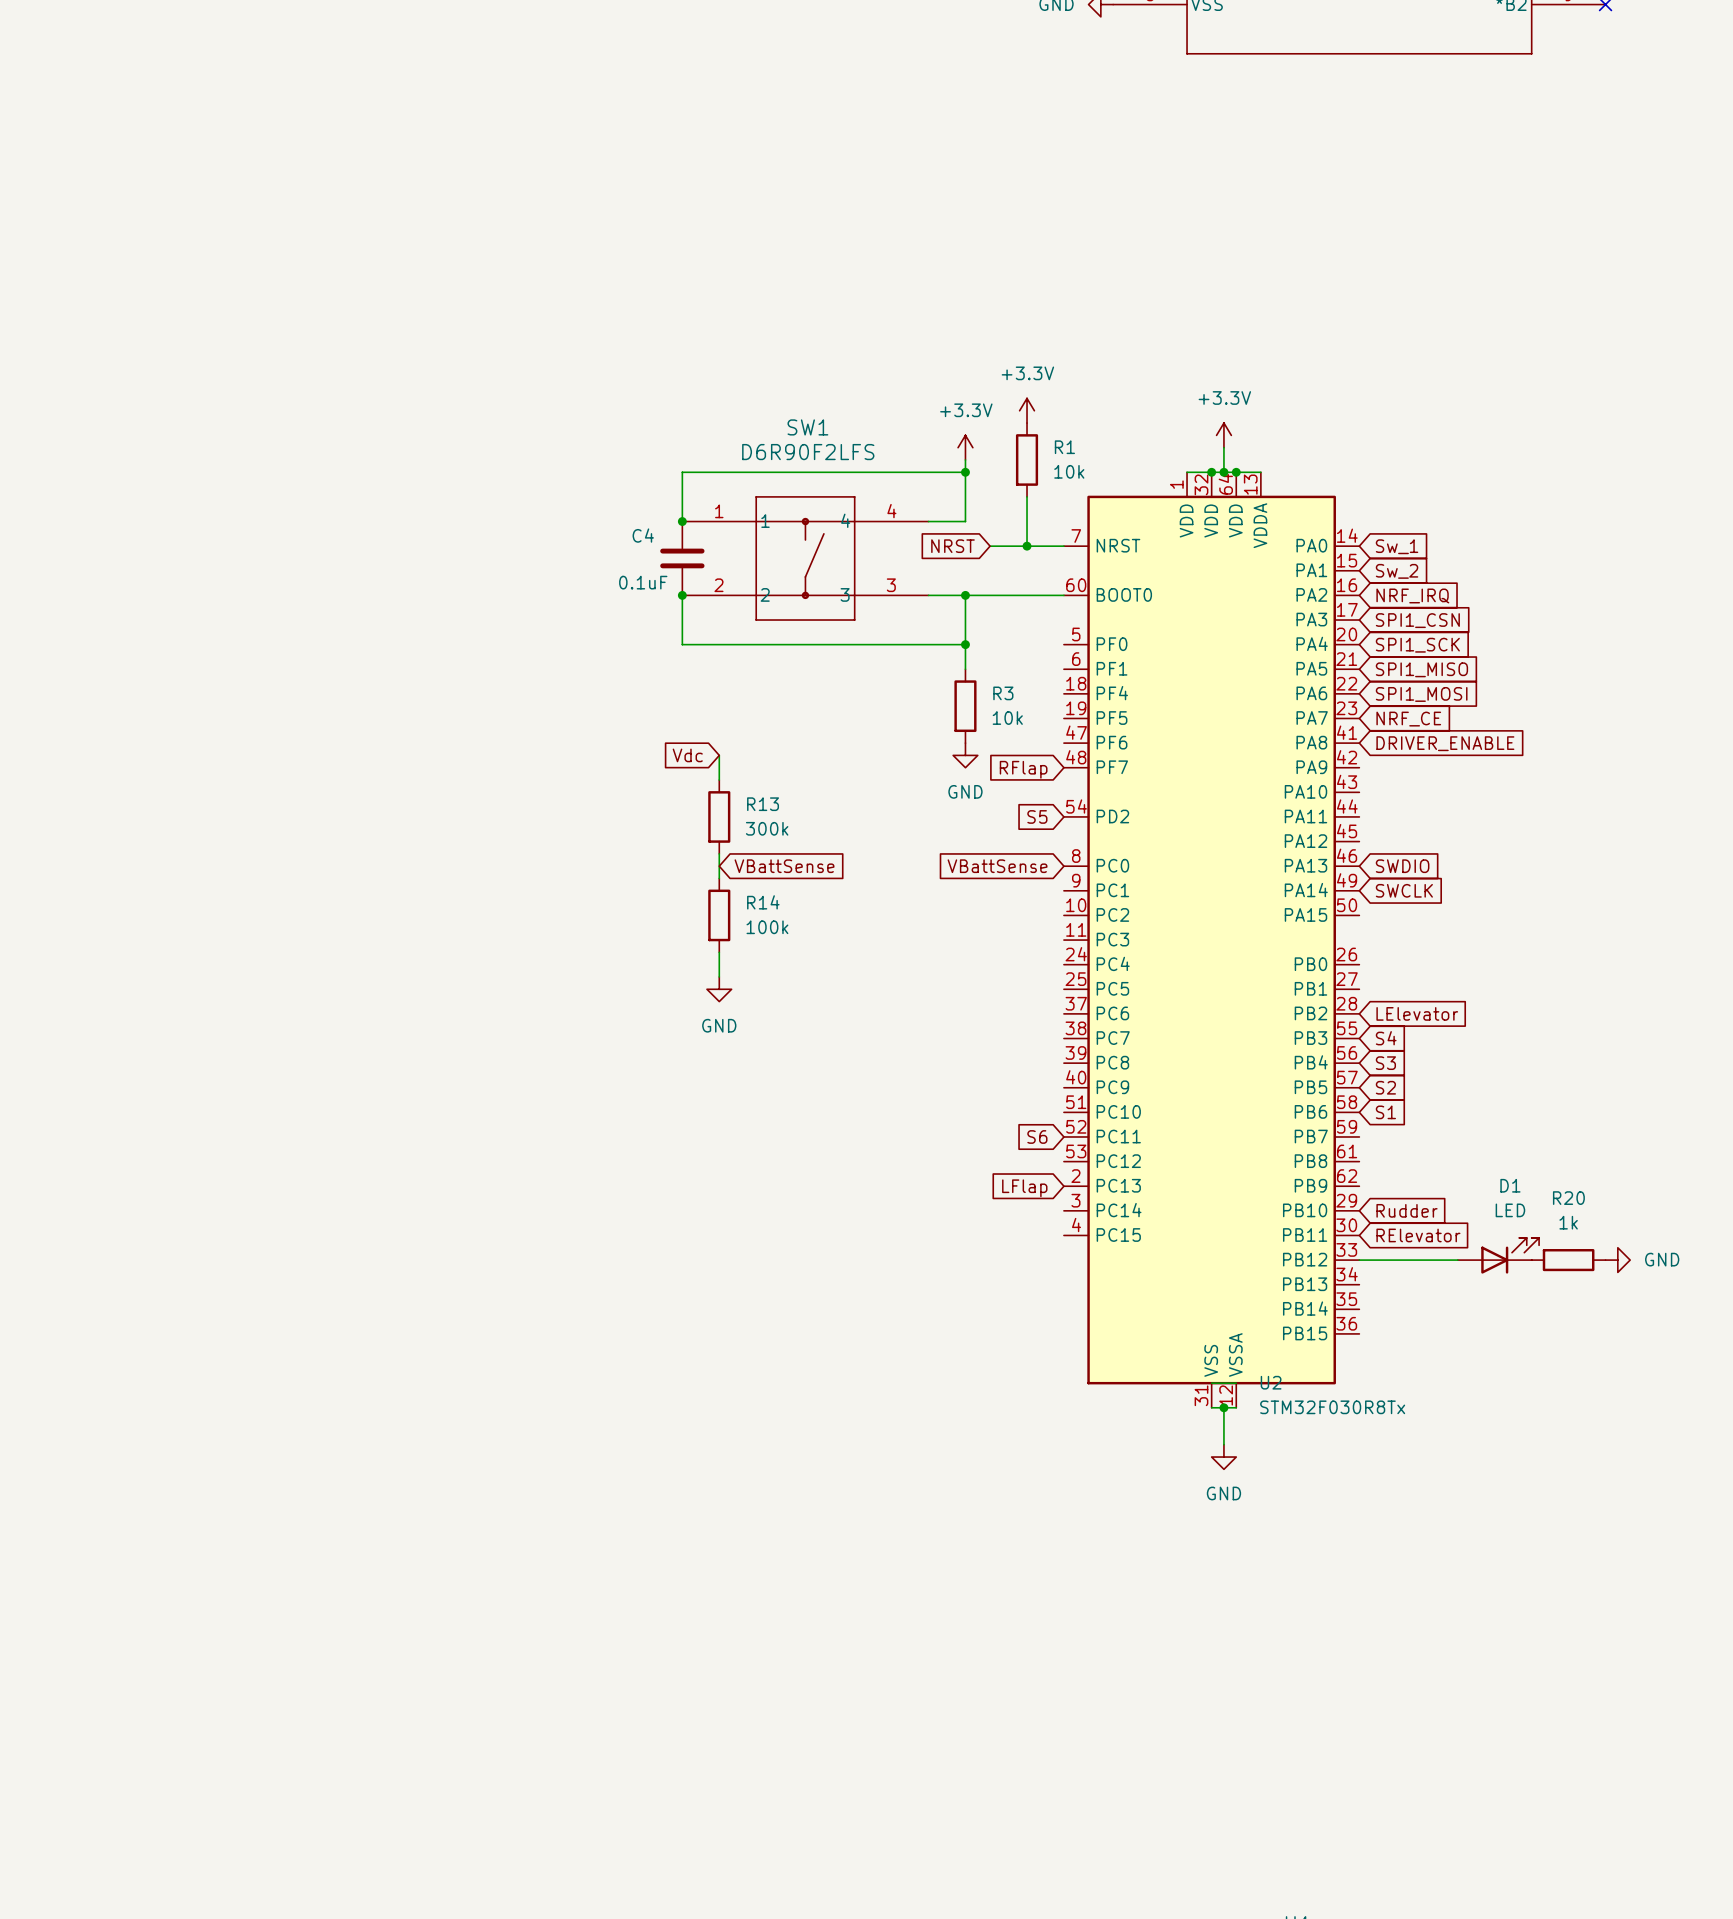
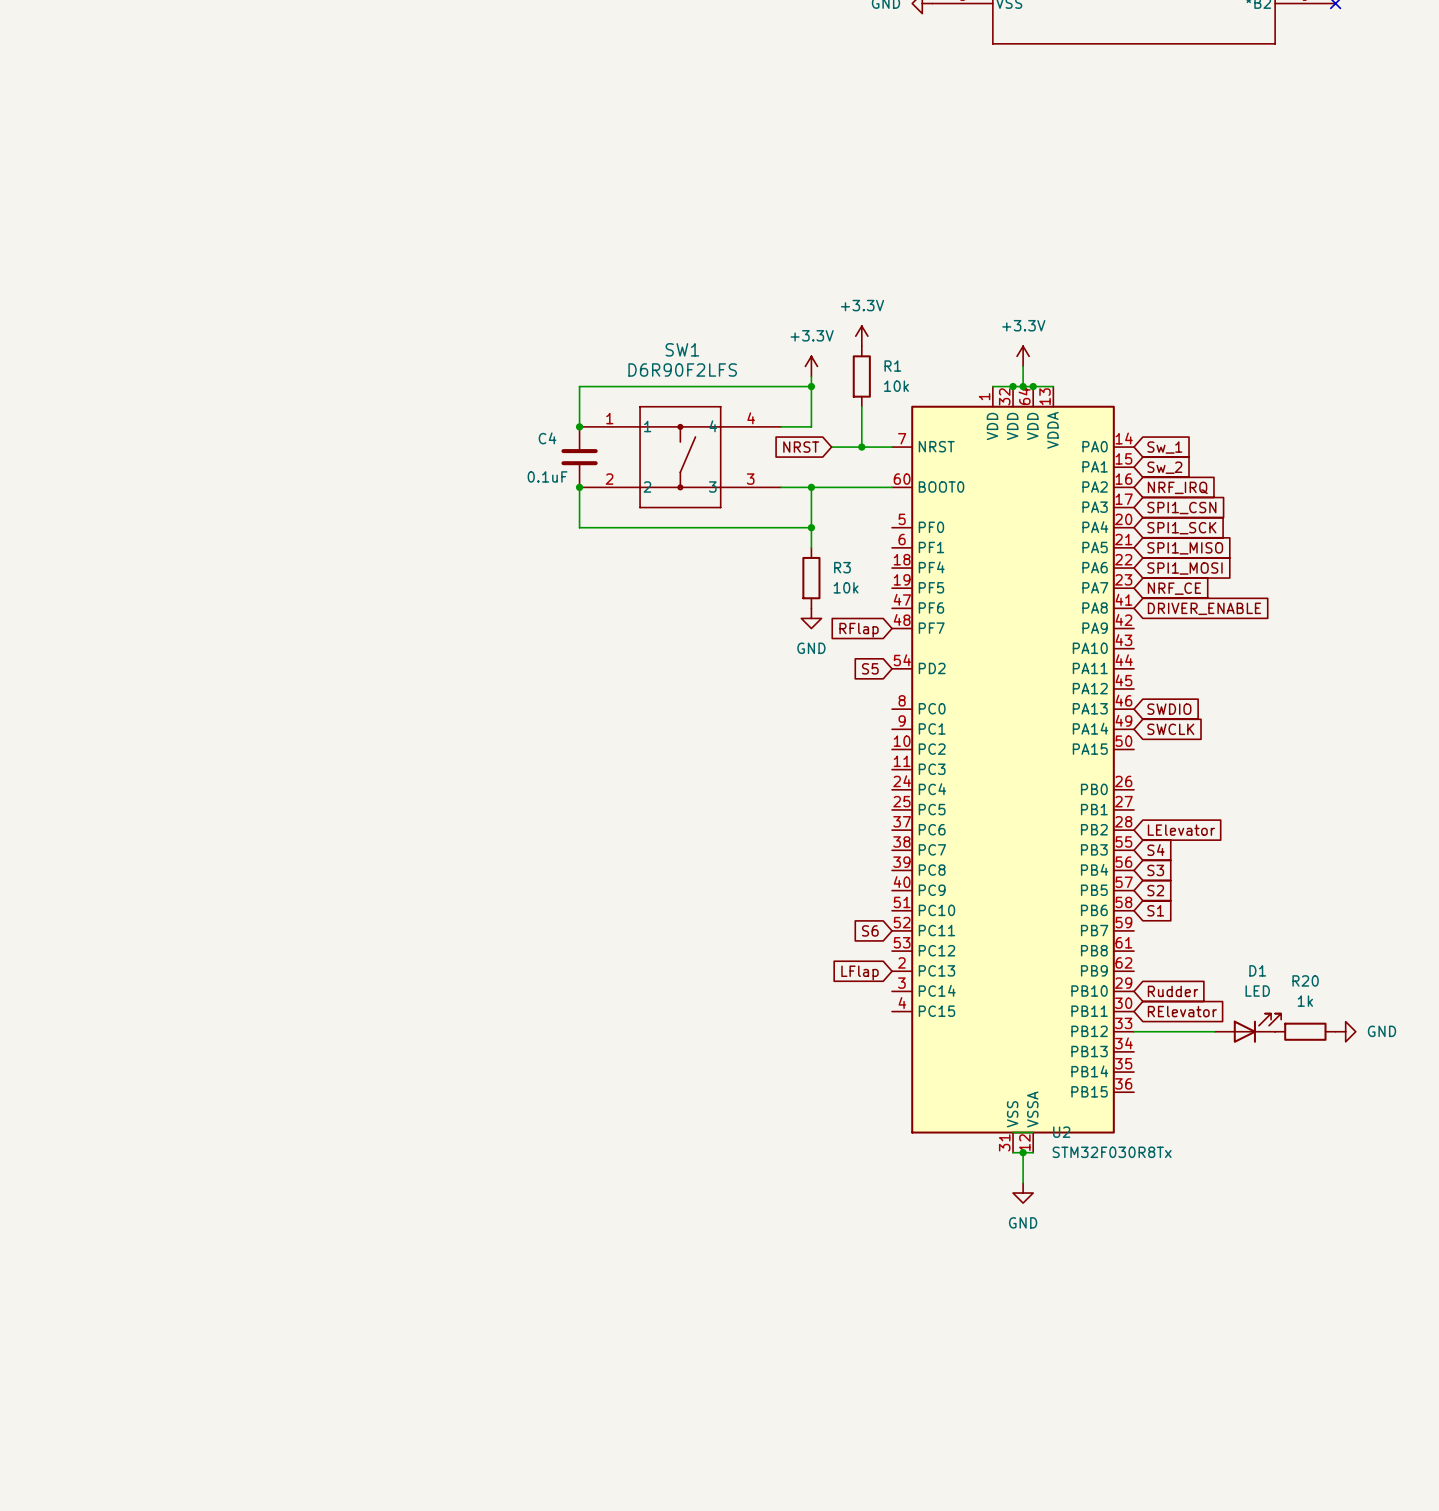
global label: Vdc (687, 755) -> none
wire: (719, 755) (719, 780) -> none
R13: 300k (719, 816) -> none
wire: (719, 853) (719, 878) -> none
global label: VBattSense (784, 866) -> none
global label: VBattSense (997, 866) -> none
R14: 100k (719, 915) -> none
wire: (719, 952) (719, 976) -> none
power symbol: GND (719, 989) -> none

